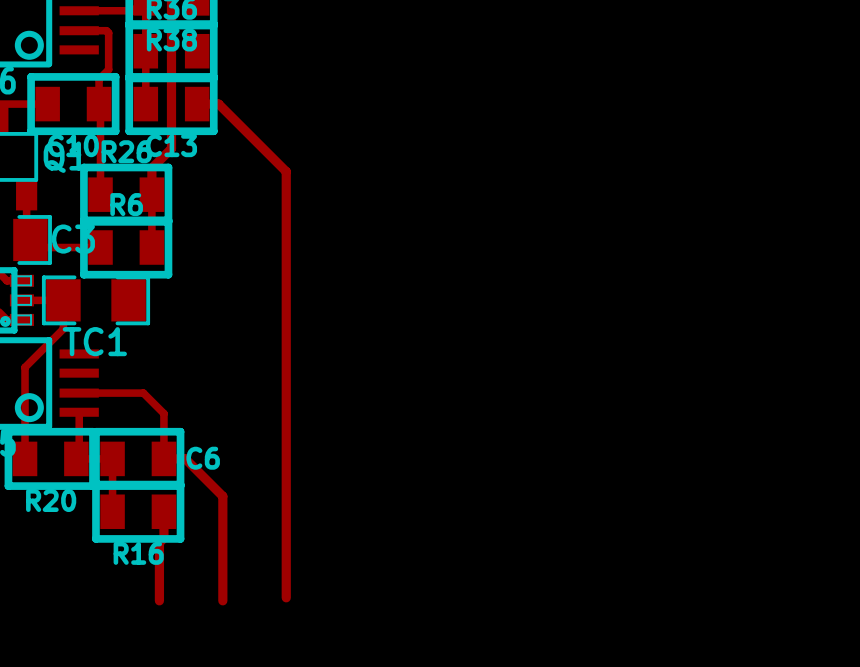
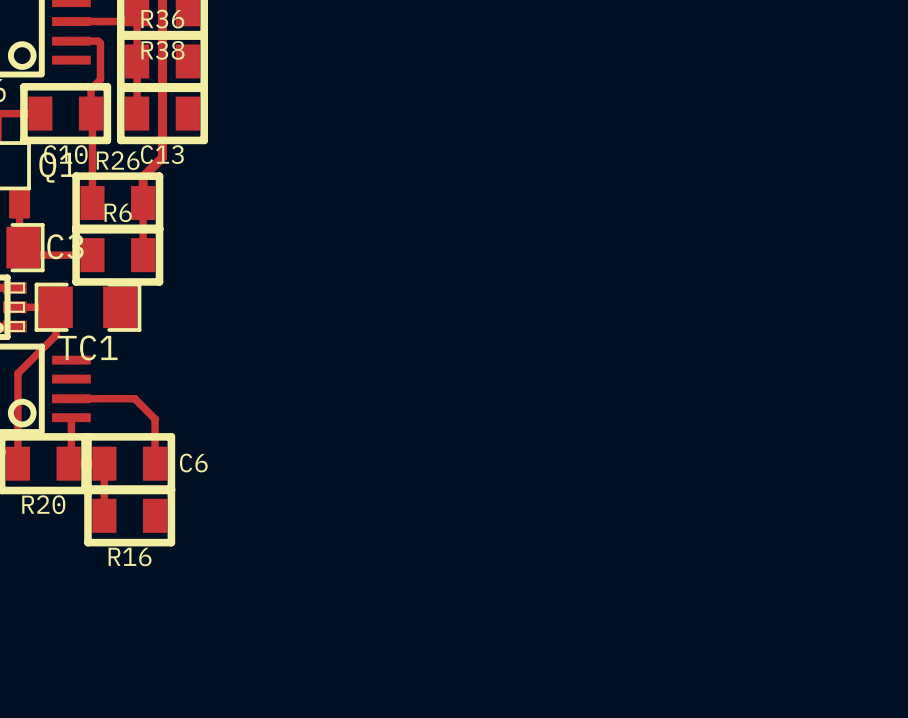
top track: (197, 104) (218, 104) (286, 171) (286, 597) -> none
top track: (163, 458) (185, 458) (222, 496) (222, 600) -> none
top track: (163, 511) (163, 538) (159, 542) (159, 600) -> none

